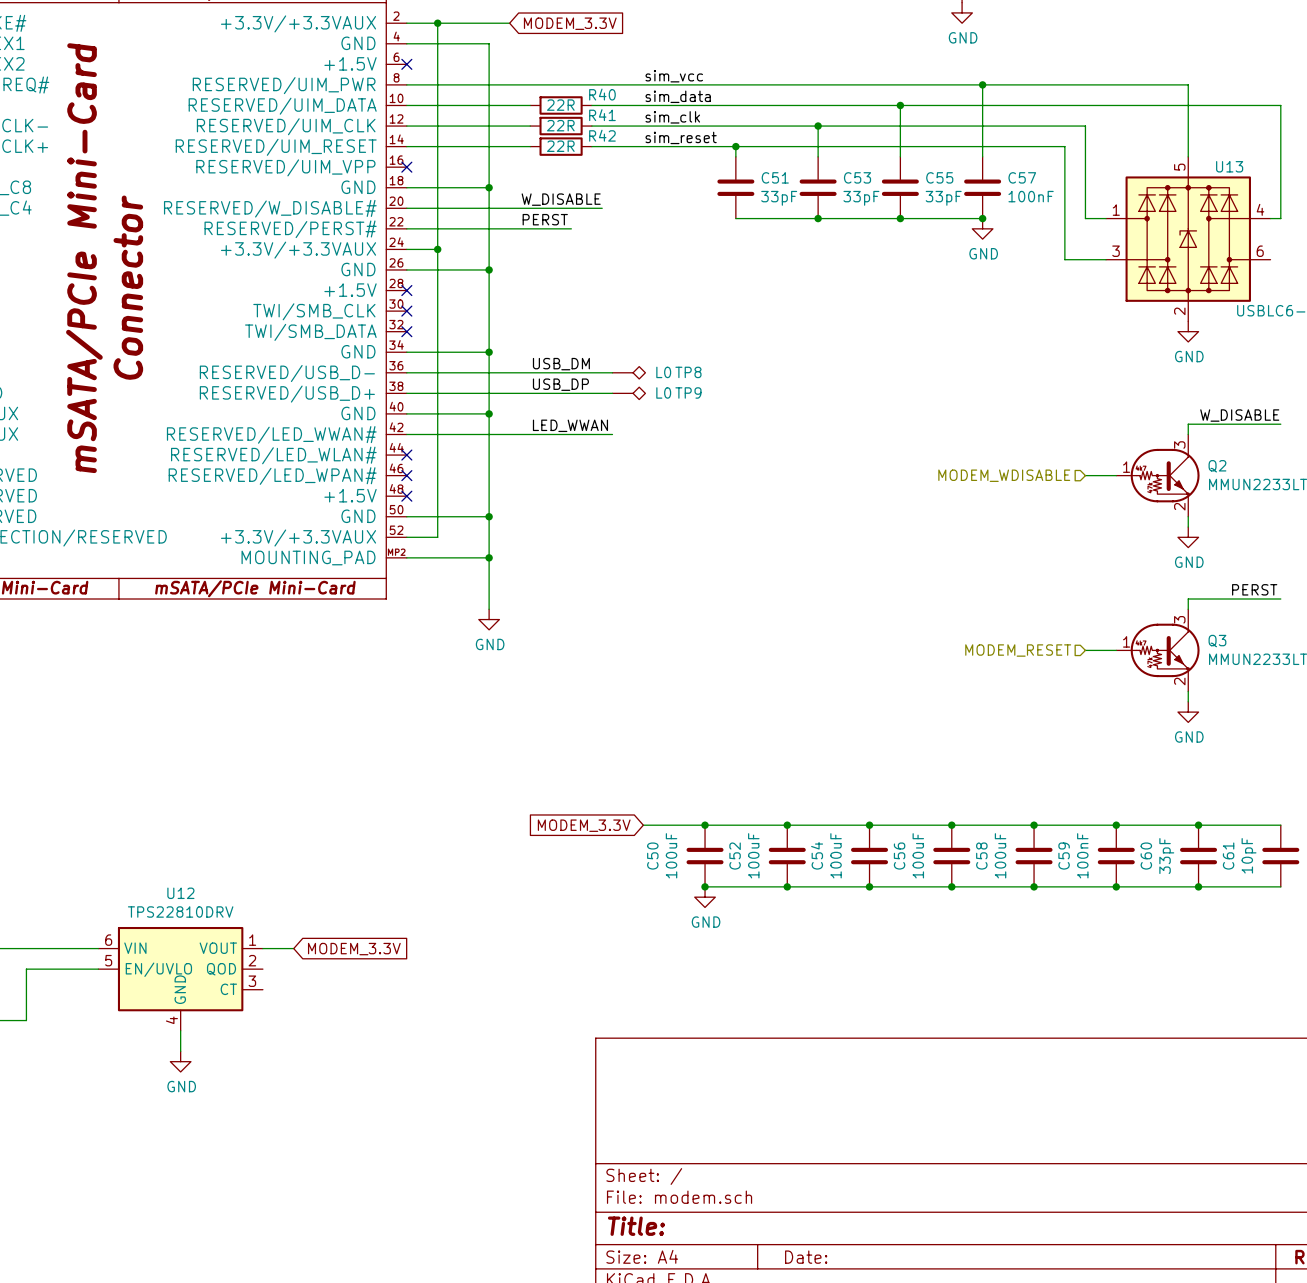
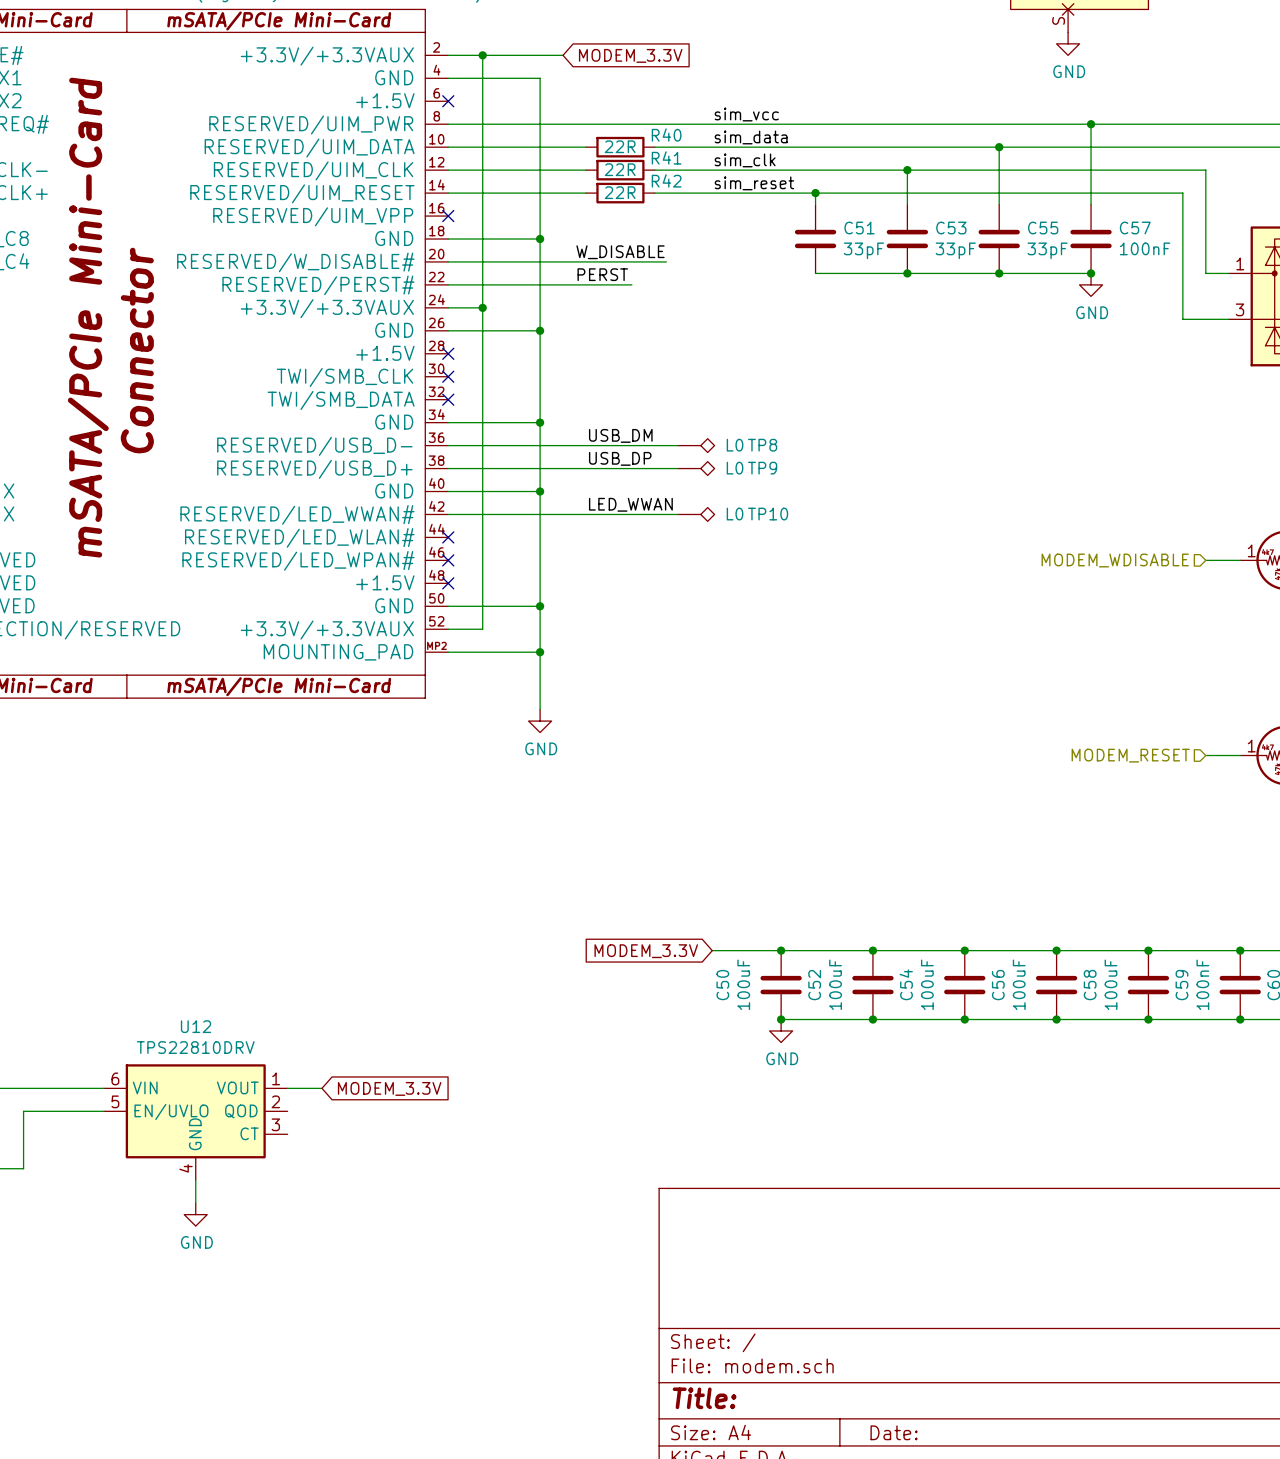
TP10: none -> L0 (696, 514)

